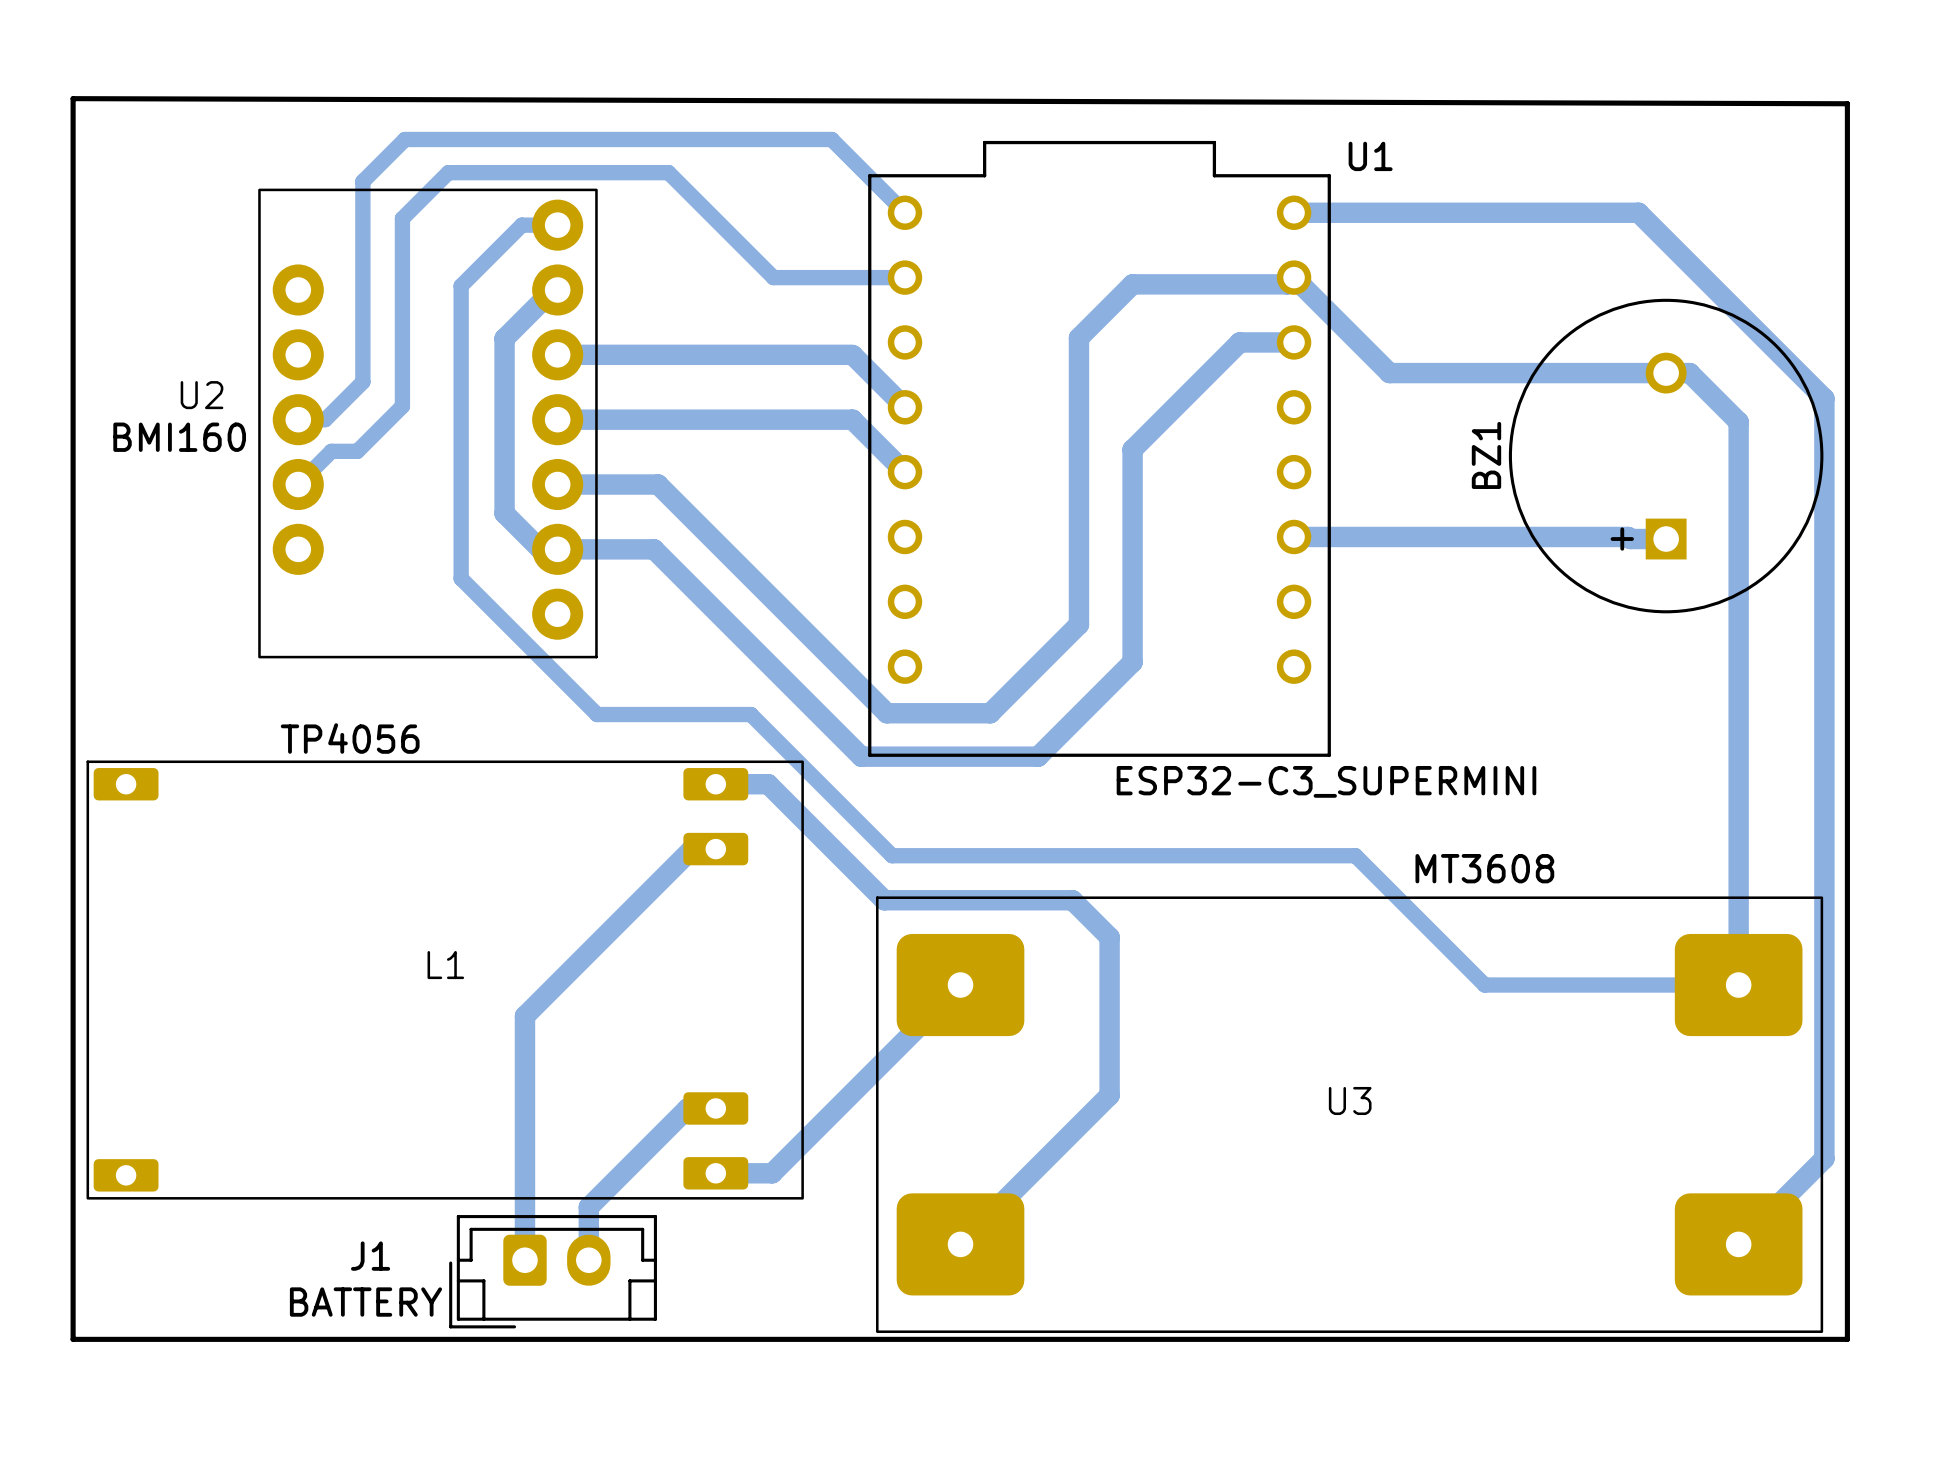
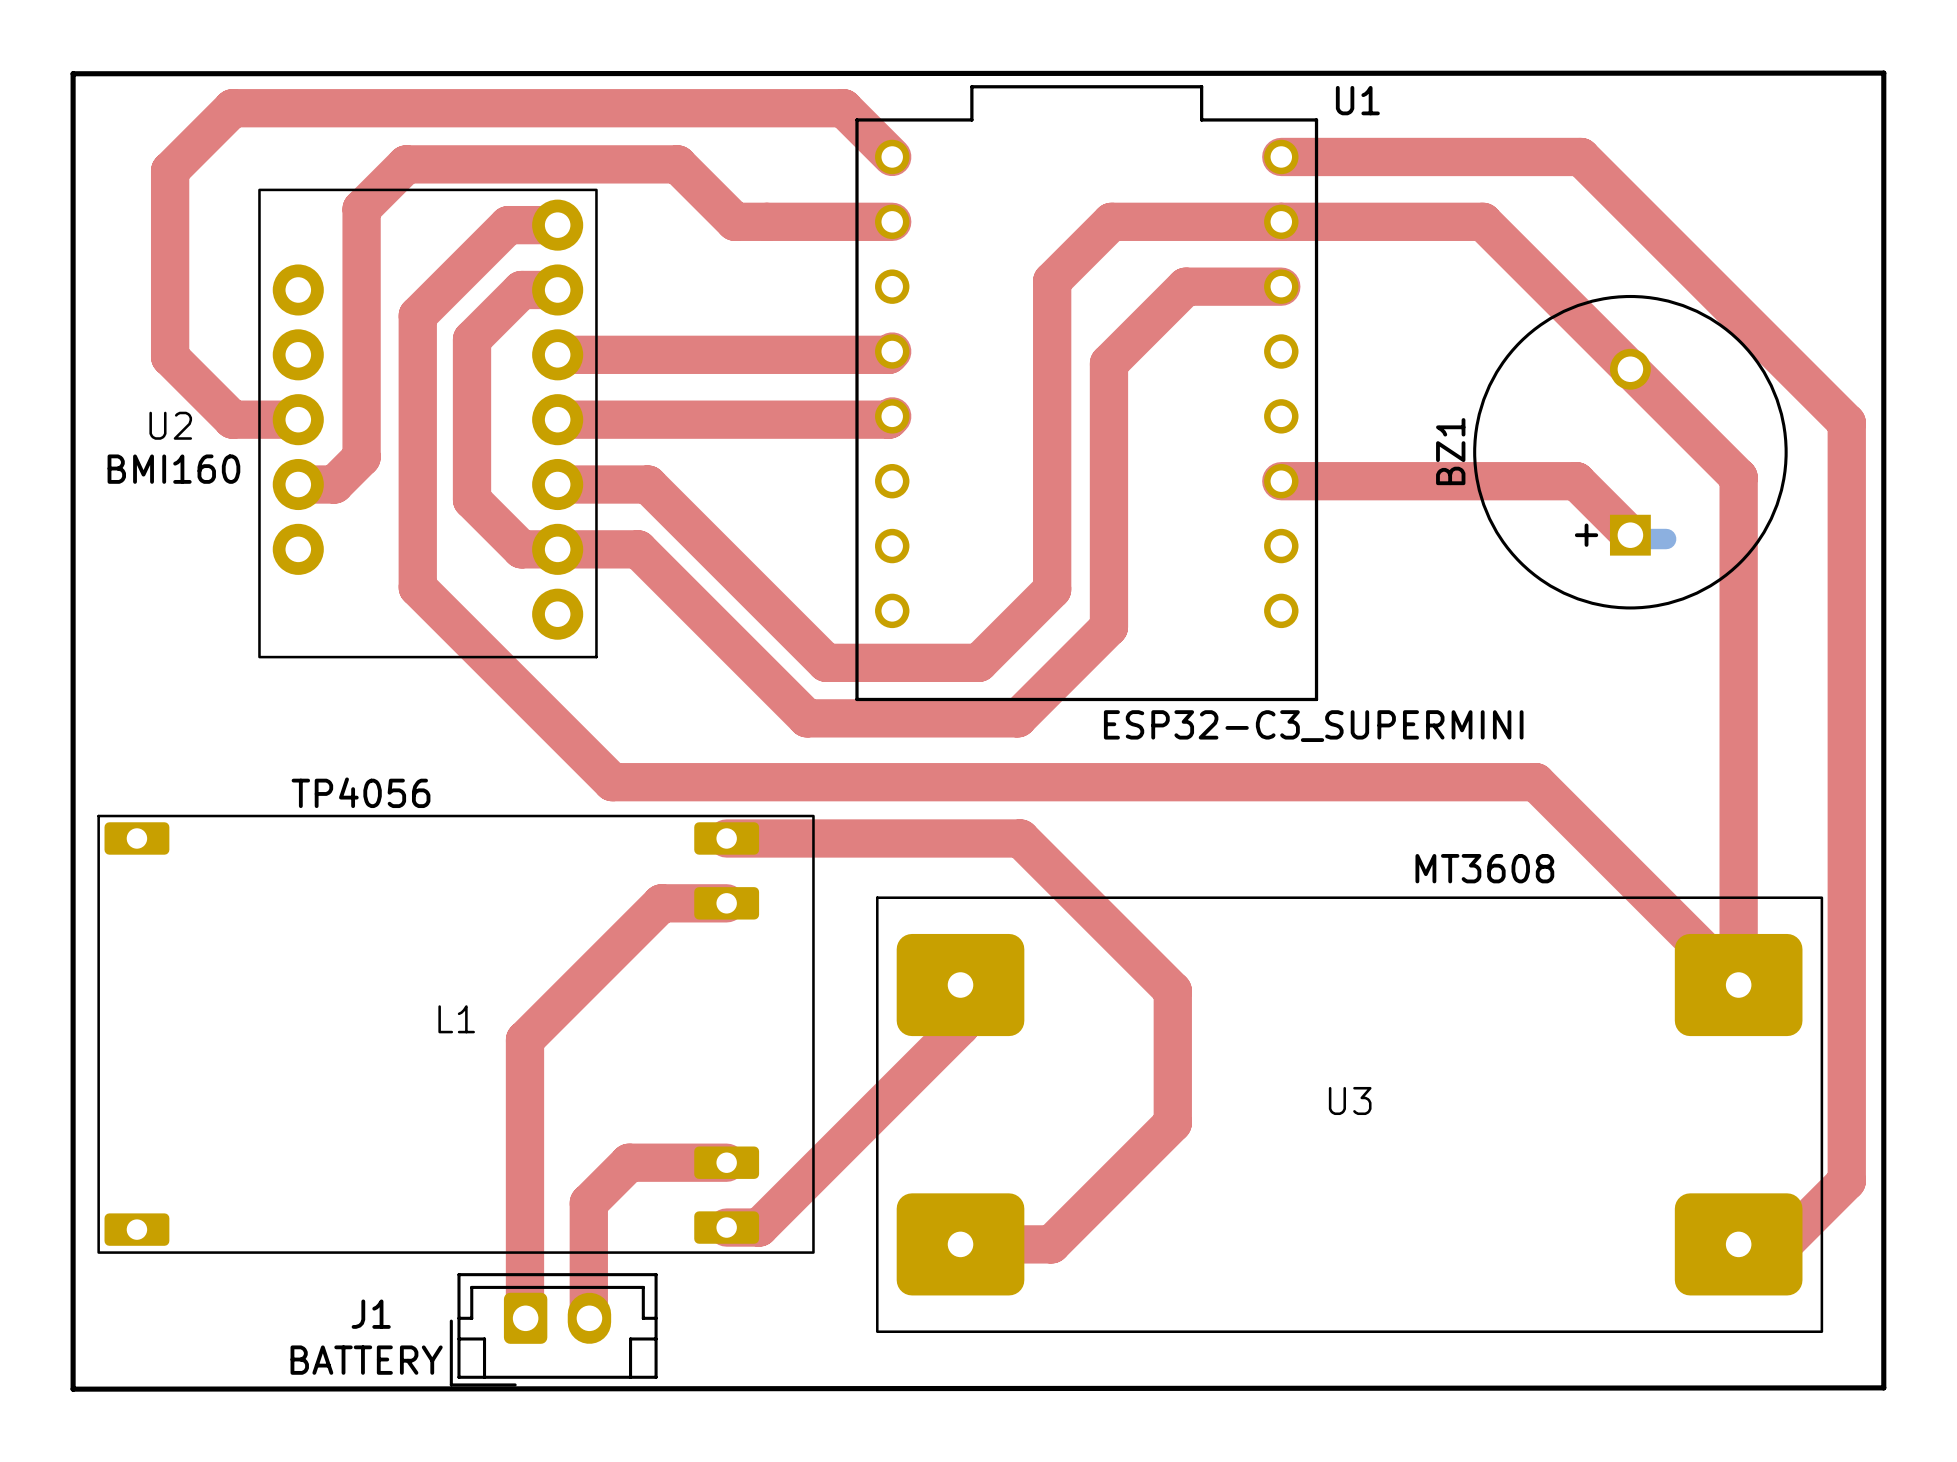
board edge: (73, 98) (1847, 103) (1847, 1339) (73, 1339) -> (73, 98) (73, 73) (1883, 73) (1883, 1387) (73, 1389) (73, 1339)
top track: none -> (892, 156) (843, 108) (232, 108) (170, 170) (170, 357) (232, 419) (298, 419)
top track: none -> (1281, 156) (1580, 156) (1846, 422) (1846, 1181) (1783, 1244) (1738, 1244)
bottom track: (904, 212) (831, 139) (404, 139) (362, 181) (362, 382) (325, 419) (298, 419) -> none
bottom track: (1294, 212) (1638, 212) (1824, 398) (1824, 1158) (1738, 1244) -> none
top track: none -> (892, 221) (734, 221) (677, 164) (406, 164) (361, 209) (361, 457) (334, 484) (298, 484)
bottom track: (557, 225) (521, 225) (461, 285) (461, 578) (597, 714) (750, 714) (892, 855) (1355, 855) (1484, 985) (1738, 985) (1738, 421) (1689, 373) (1389, 373) (1294, 277) (1287, 284) (1132, 284) (1078, 337) (1078, 624) (990, 713) (886, 713) (658, 484) (557, 484) -> none
top track: none -> (557, 225) (508, 225) (417, 315) (417, 587) (612, 782) (1535, 782) (1738, 985) (1738, 477) (1482, 221) (1111, 221) (1052, 281) (1052, 589) (978, 662) (826, 662) (647, 484) (557, 484)
bottom track: (904, 277) (773, 277) (668, 172) (448, 172) (402, 218) (402, 406) (357, 451) (331, 451) (298, 484) -> none
top track: none -> (1281, 286) (1185, 286) (1108, 363) (1108, 627) (1017, 718) (807, 718) (638, 549) (521, 549) (472, 499) (472, 339) (521, 289) (557, 289)
bottom track: (557, 289) (553, 289) (504, 338) (504, 513) (540, 549) (654, 549) (861, 756) (1038, 756) (1132, 662) (1132, 449) (1239, 342) (1294, 342) -> none
top track: none -> (892, 351) (888, 354) (557, 354)
bottom track: (557, 354) (852, 354) (904, 407) -> none
U2 name position: U2 (202, 395) -> U2 (170, 425)
top track: none -> (892, 416) (888, 419) (557, 419)
bottom track: (557, 419) (852, 419) (904, 472) -> none
U2 value position: BMI160 (179, 437) -> BMI160 (173, 469)
U1 position: (1099, 448) -> (1086, 393)
BZ1 position: (1666, 456) -> (1630, 452)
top track: none -> (1281, 481) (1576, 481) (1630, 535)
bottom track: (1294, 536) (1628, 536) -> none
bottom track: (715, 784) (768, 784) (884, 900) (1072, 900) (1109, 937) (1109, 1095) (960, 1244) -> none
top track: none -> (726, 838) (1020, 838) (1172, 990) (1172, 1123) (1051, 1244) (960, 1244)
bottom track: (715, 849) (692, 849) (524, 1016) (524, 1260) -> none
top track: none -> (726, 903) (661, 903) (524, 1039) (525, 1318)
L1 position: (445, 980) -> (456, 1034)
bottom track: (960, 985) (772, 1173) (715, 1173) -> none
top track: none -> (960, 985) (960, 1026) (759, 1227) (726, 1227)
bottom track: (715, 1108) (687, 1108) (588, 1207) (588, 1260) -> none
top track: none -> (726, 1162) (629, 1162) (588, 1203) (589, 1318)
J1 position: (553, 1271) -> (553, 1329)

